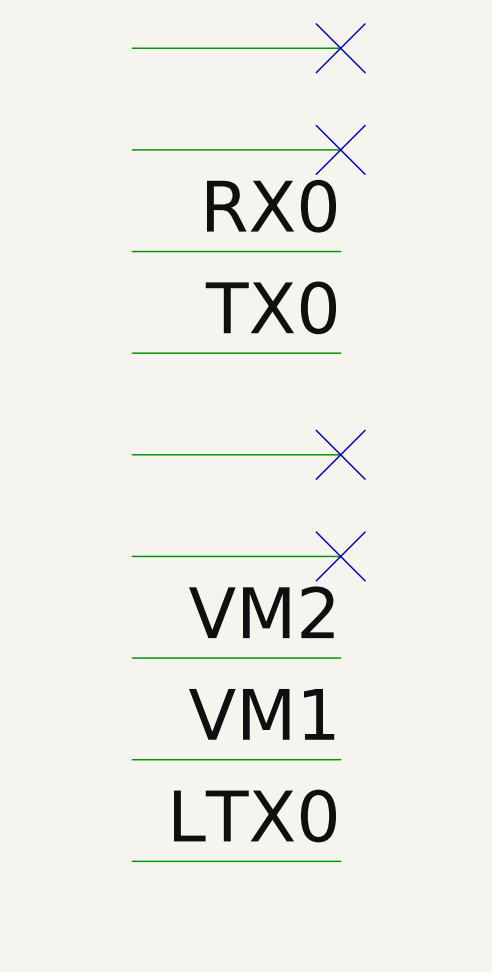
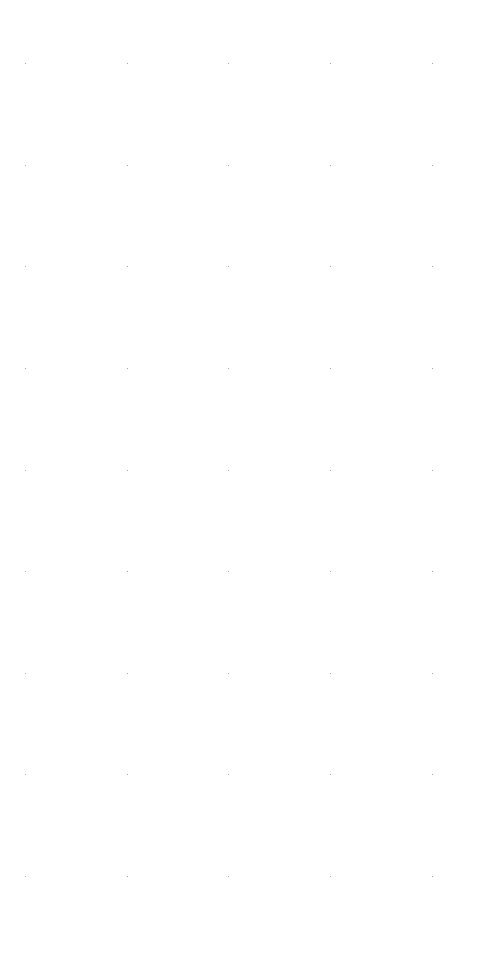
wire: (132, 48) (340, 48) -> none
no-connect mark: (340, 48) -> none
wire: (132, 149) (340, 149) -> none
no-connect mark: (340, 149) -> none
label: RX0 (271, 206) -> none
wire: (132, 251) (340, 251) -> none
label: TX0 (270, 307) -> none
wire: (132, 353) (340, 353) -> none
wire: (132, 454) (340, 454) -> none
no-connect mark: (340, 454) -> none
wire: (132, 556) (340, 556) -> none
no-connect mark: (340, 556) -> none
label: VM2 (261, 612) -> none
wire: (132, 658) (340, 658) -> none
label: VM1 (261, 714) -> none
wire: (132, 759) (340, 759) -> none
label: LTX0 (255, 816) -> none
wire: (132, 861) (340, 861) -> none

